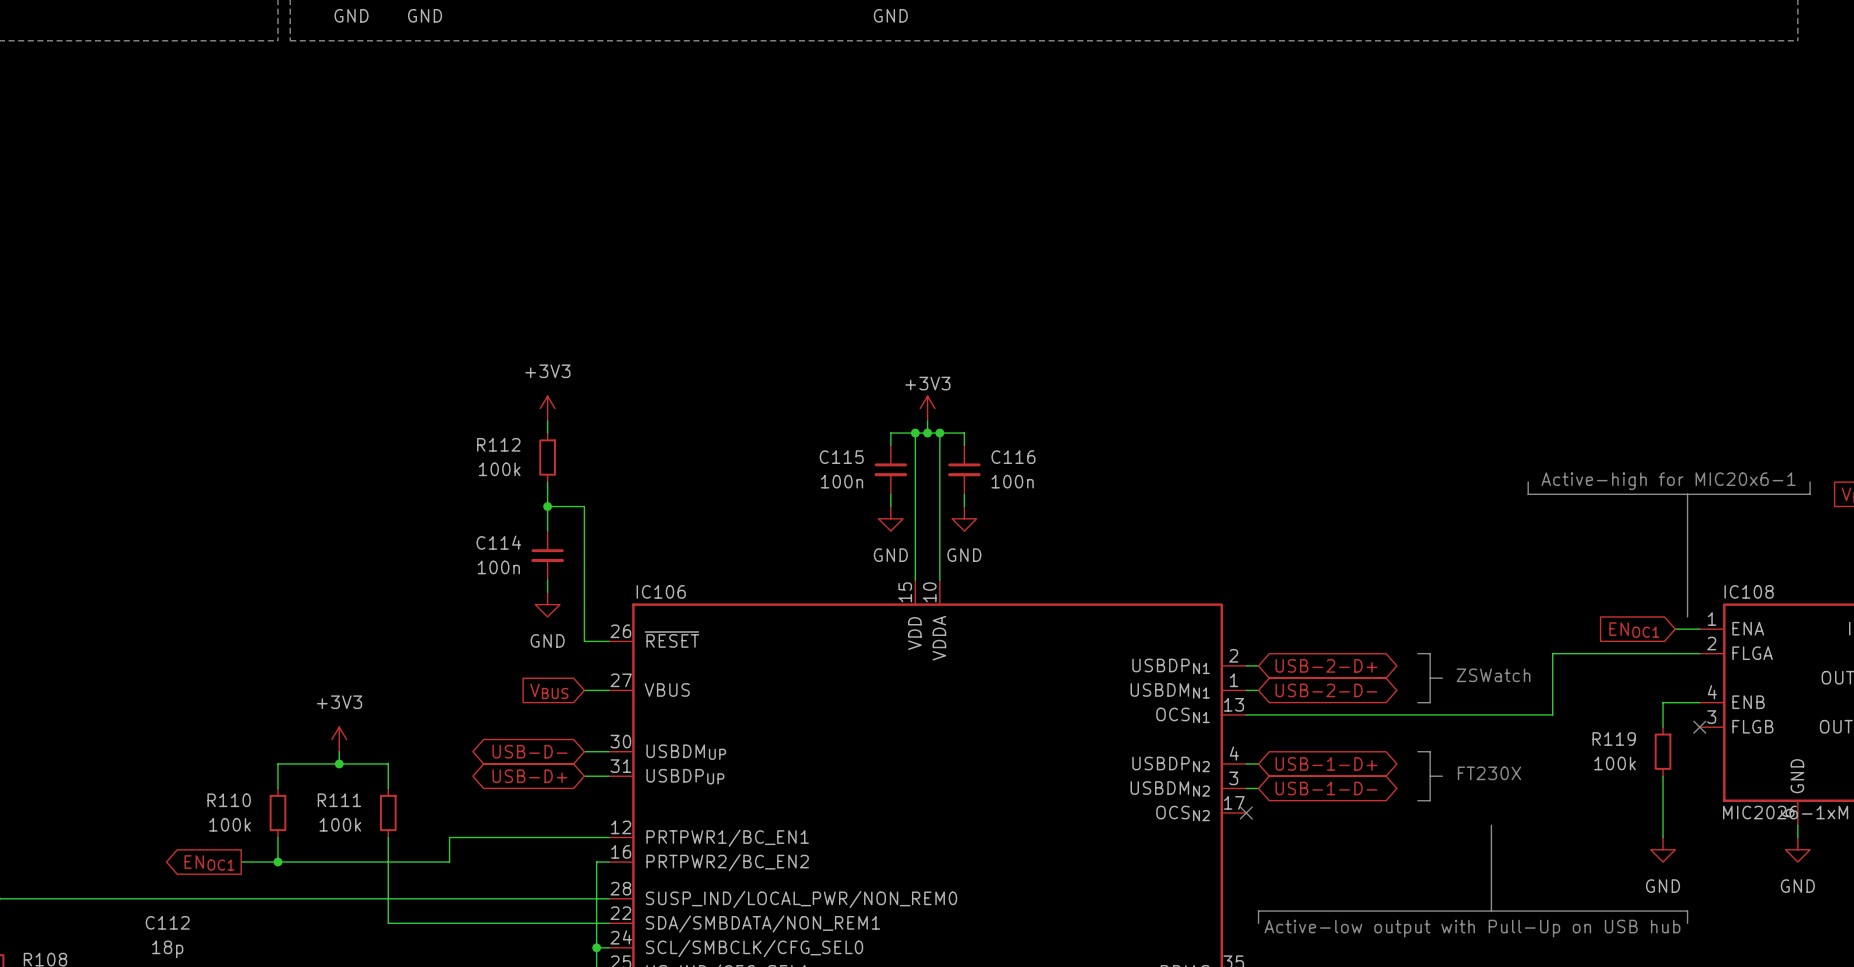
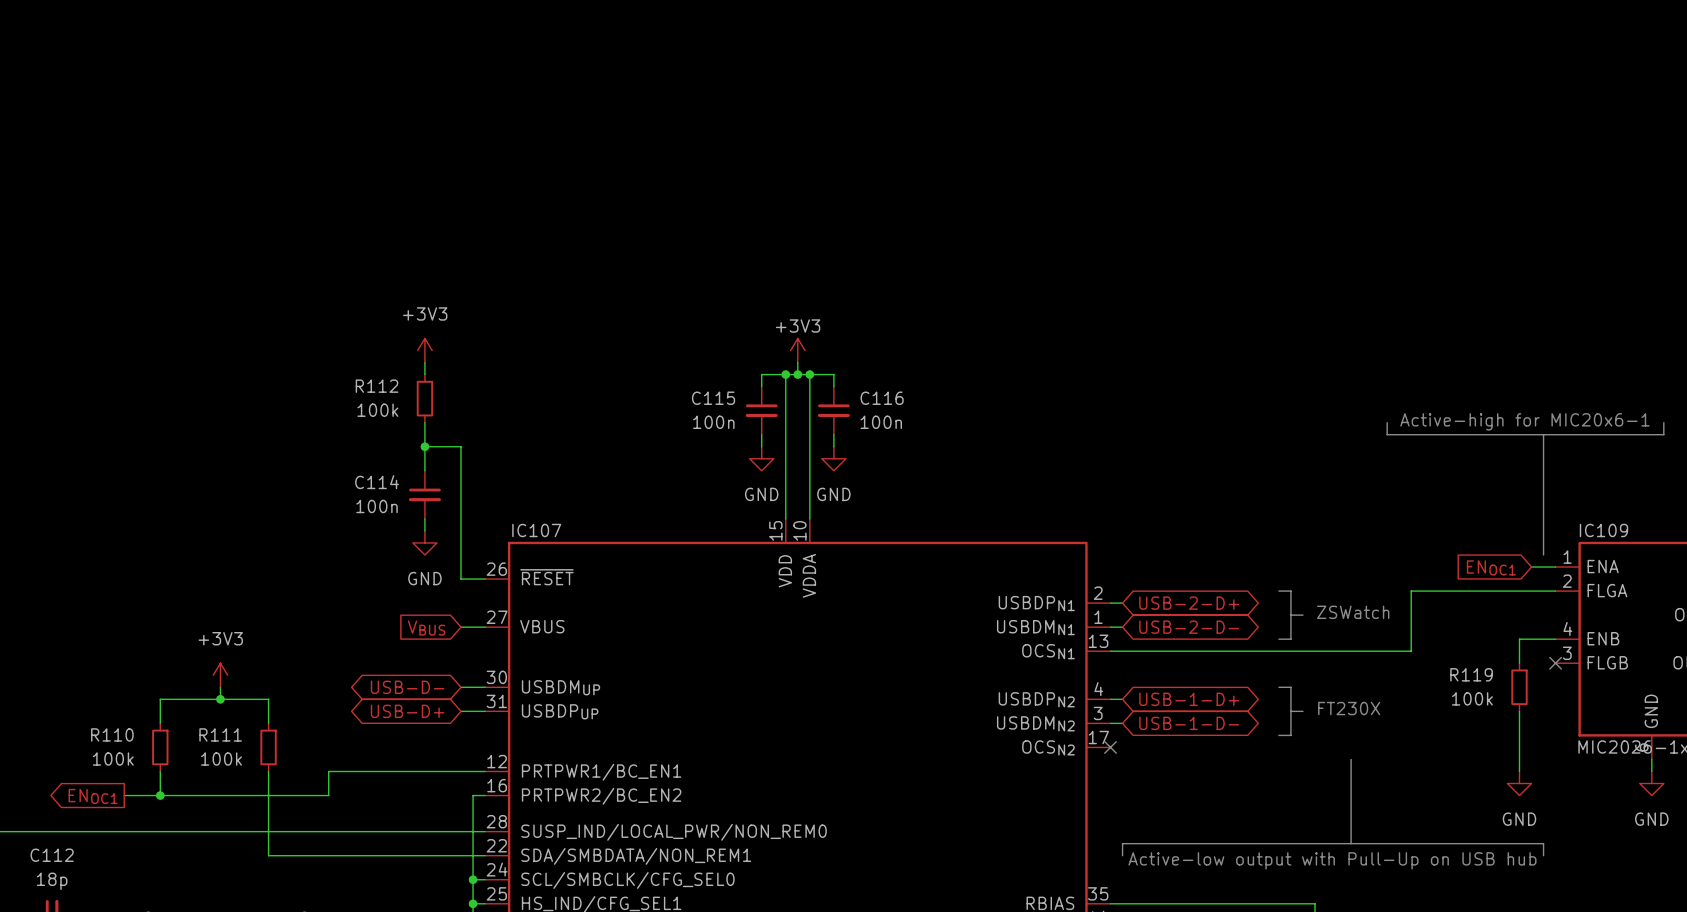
IC106 name: IC106 (661, 591) -> IC107 (536, 530)
IC108 name: IC108 (1749, 591) -> IC109 (1603, 530)

